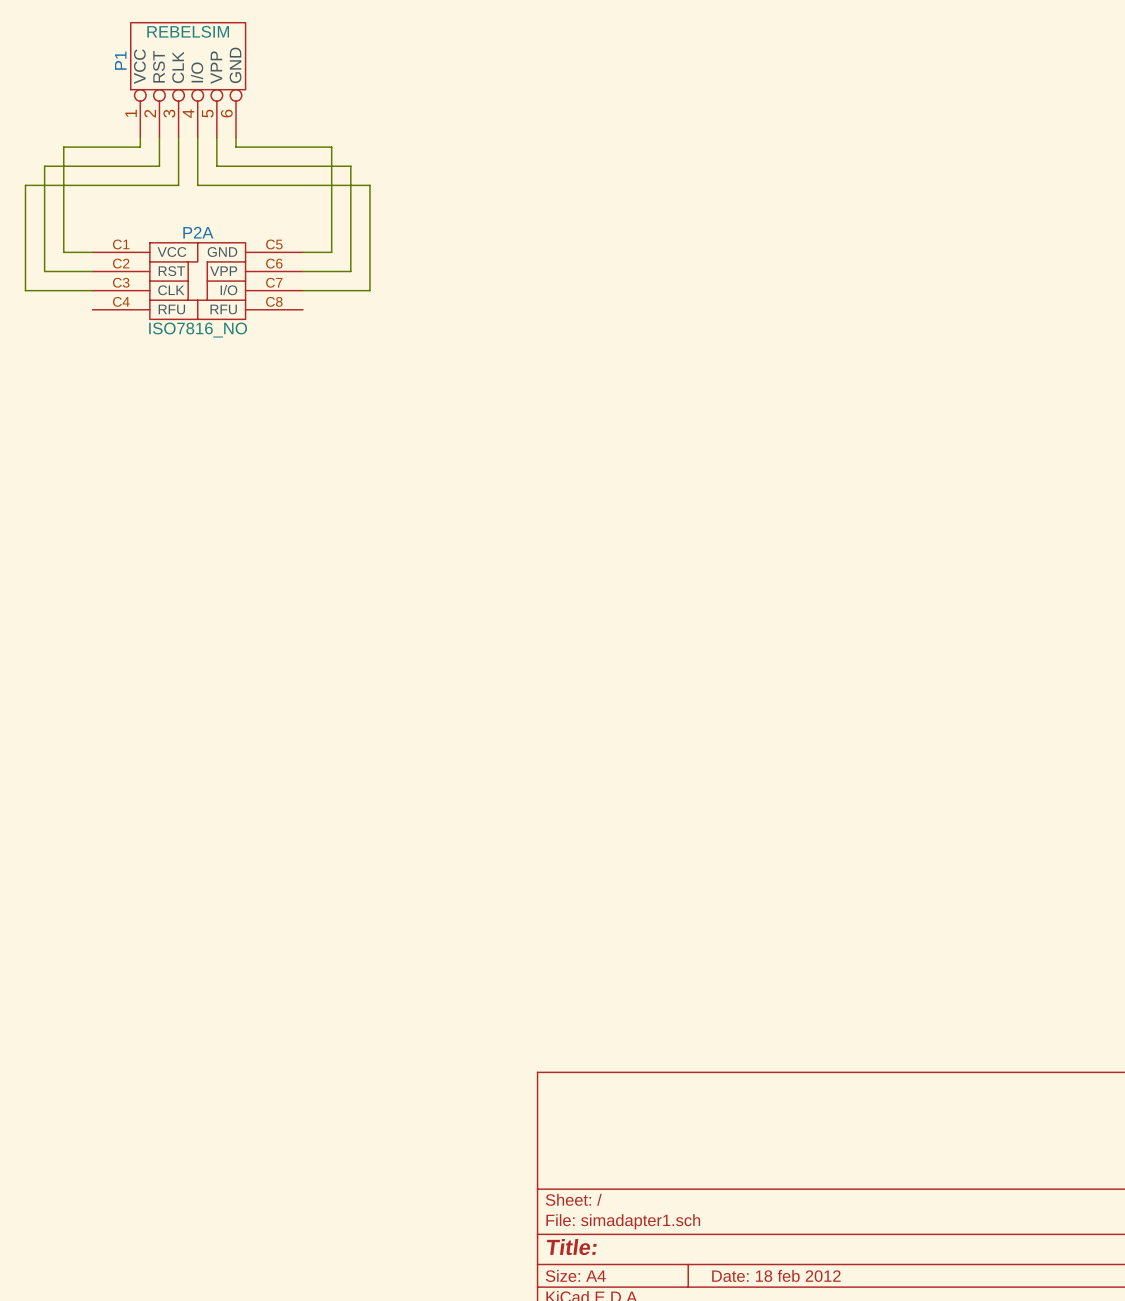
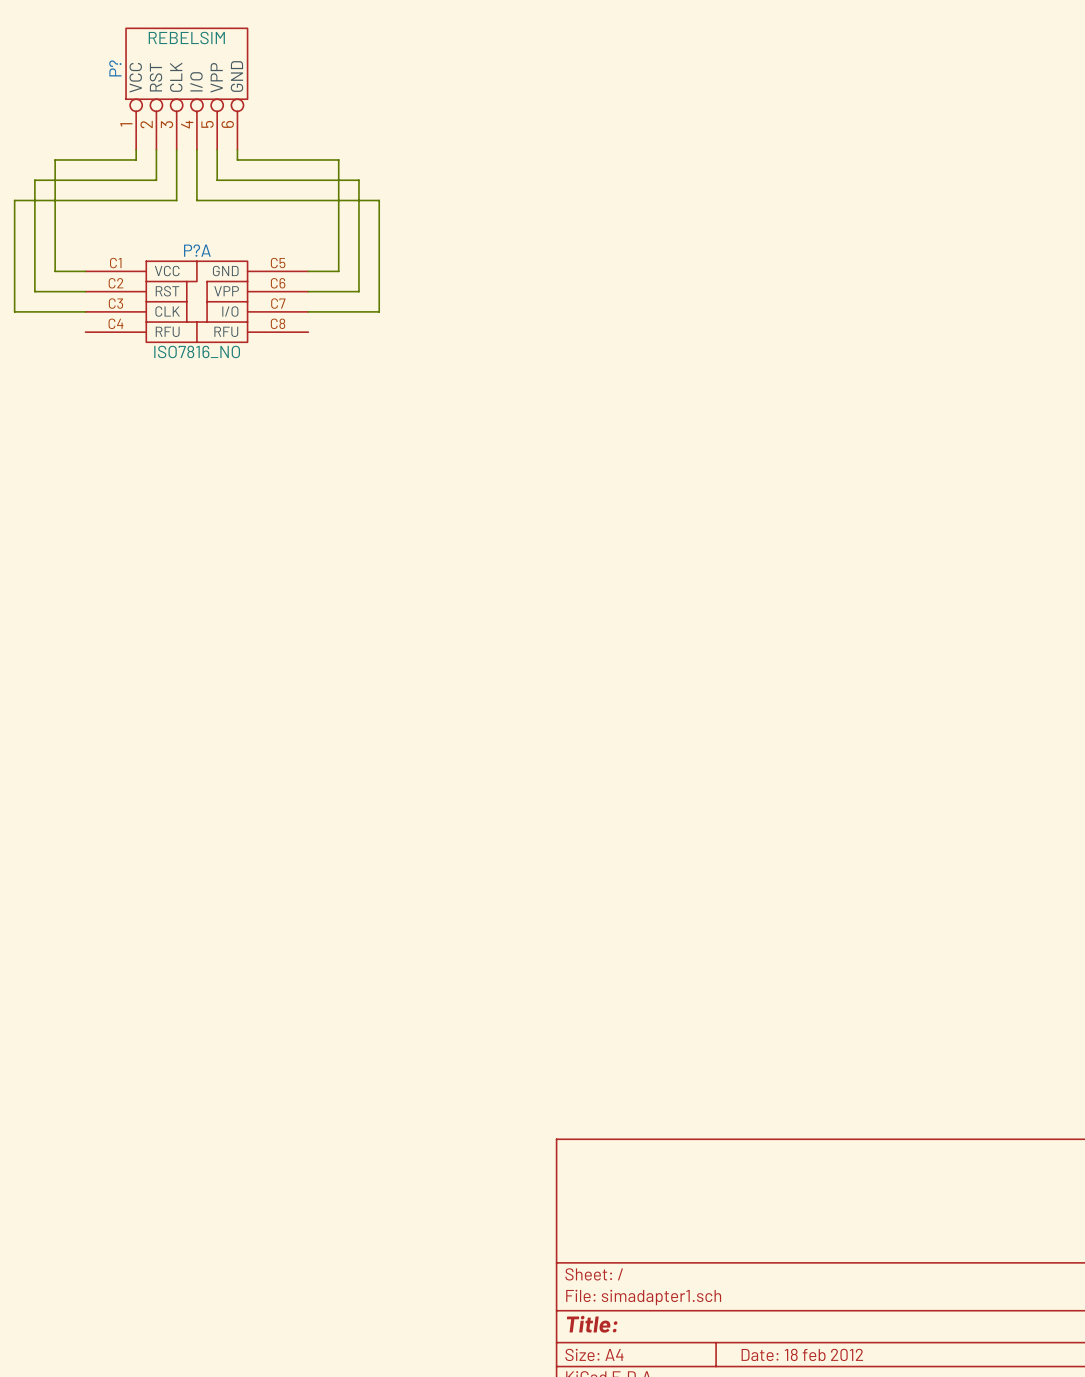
P1 name: P1 (120, 60) -> P? (115, 68)
P2A name: P2A (198, 232) -> P?A (197, 250)

